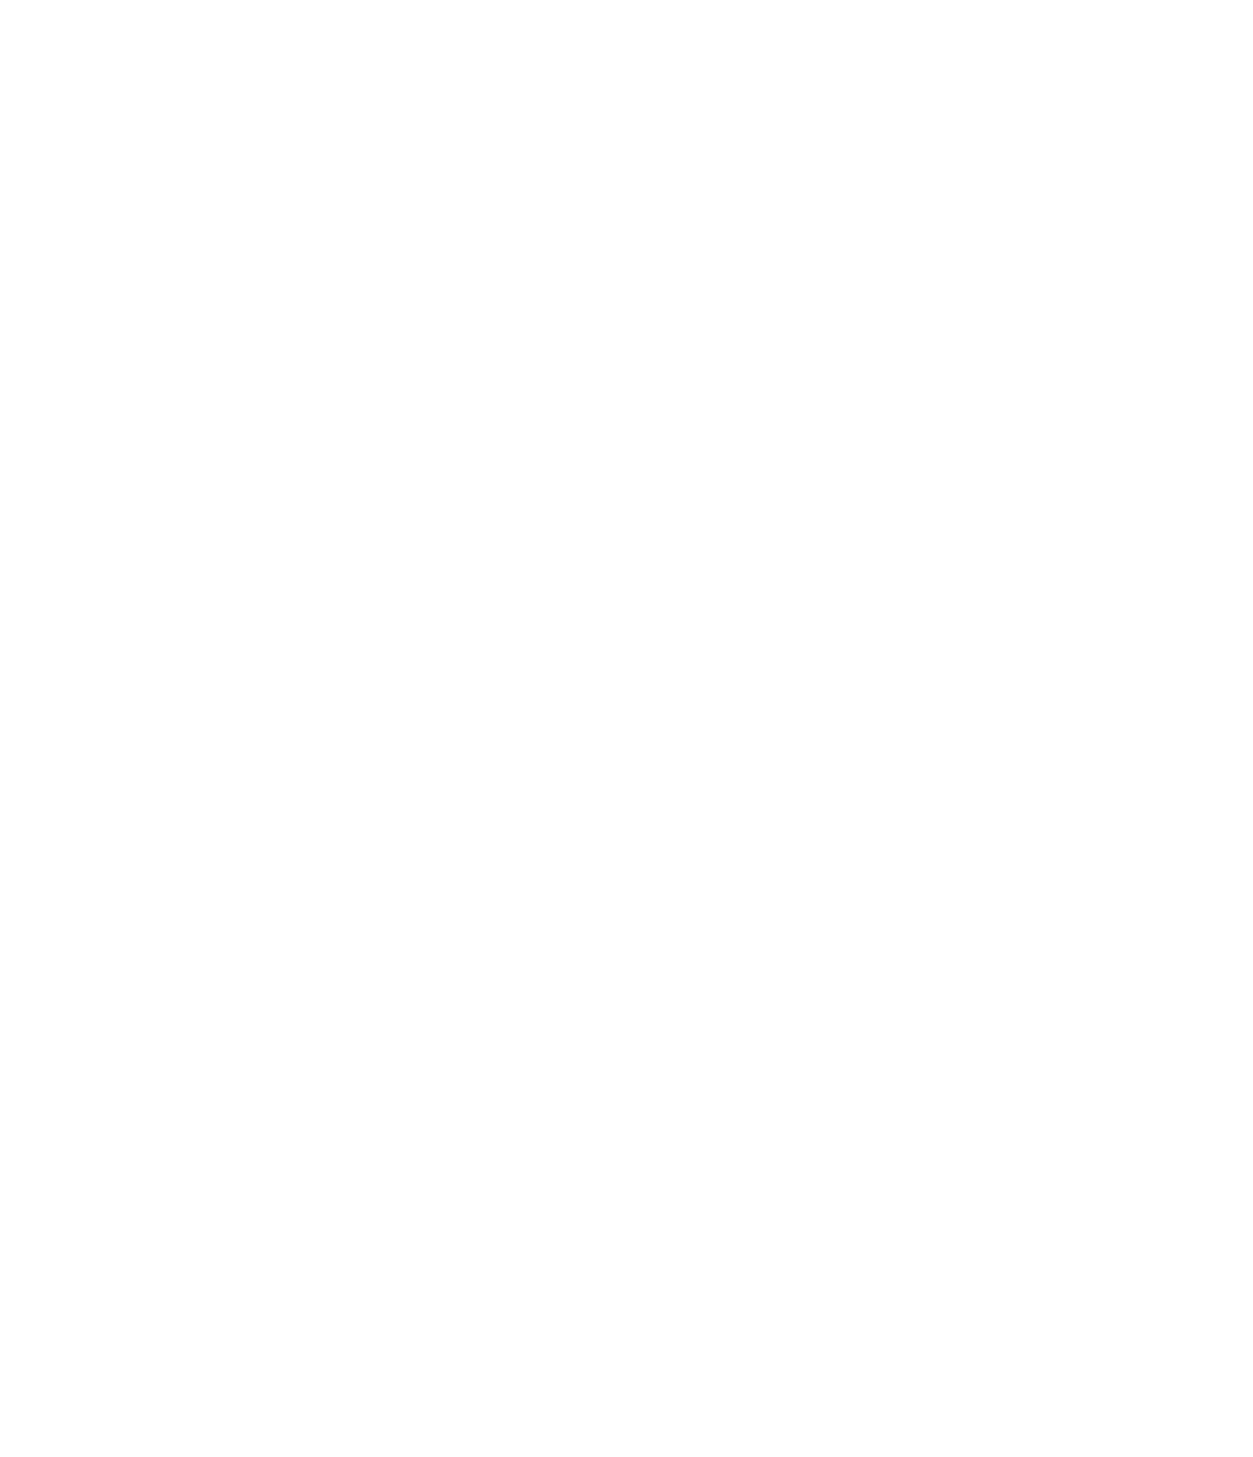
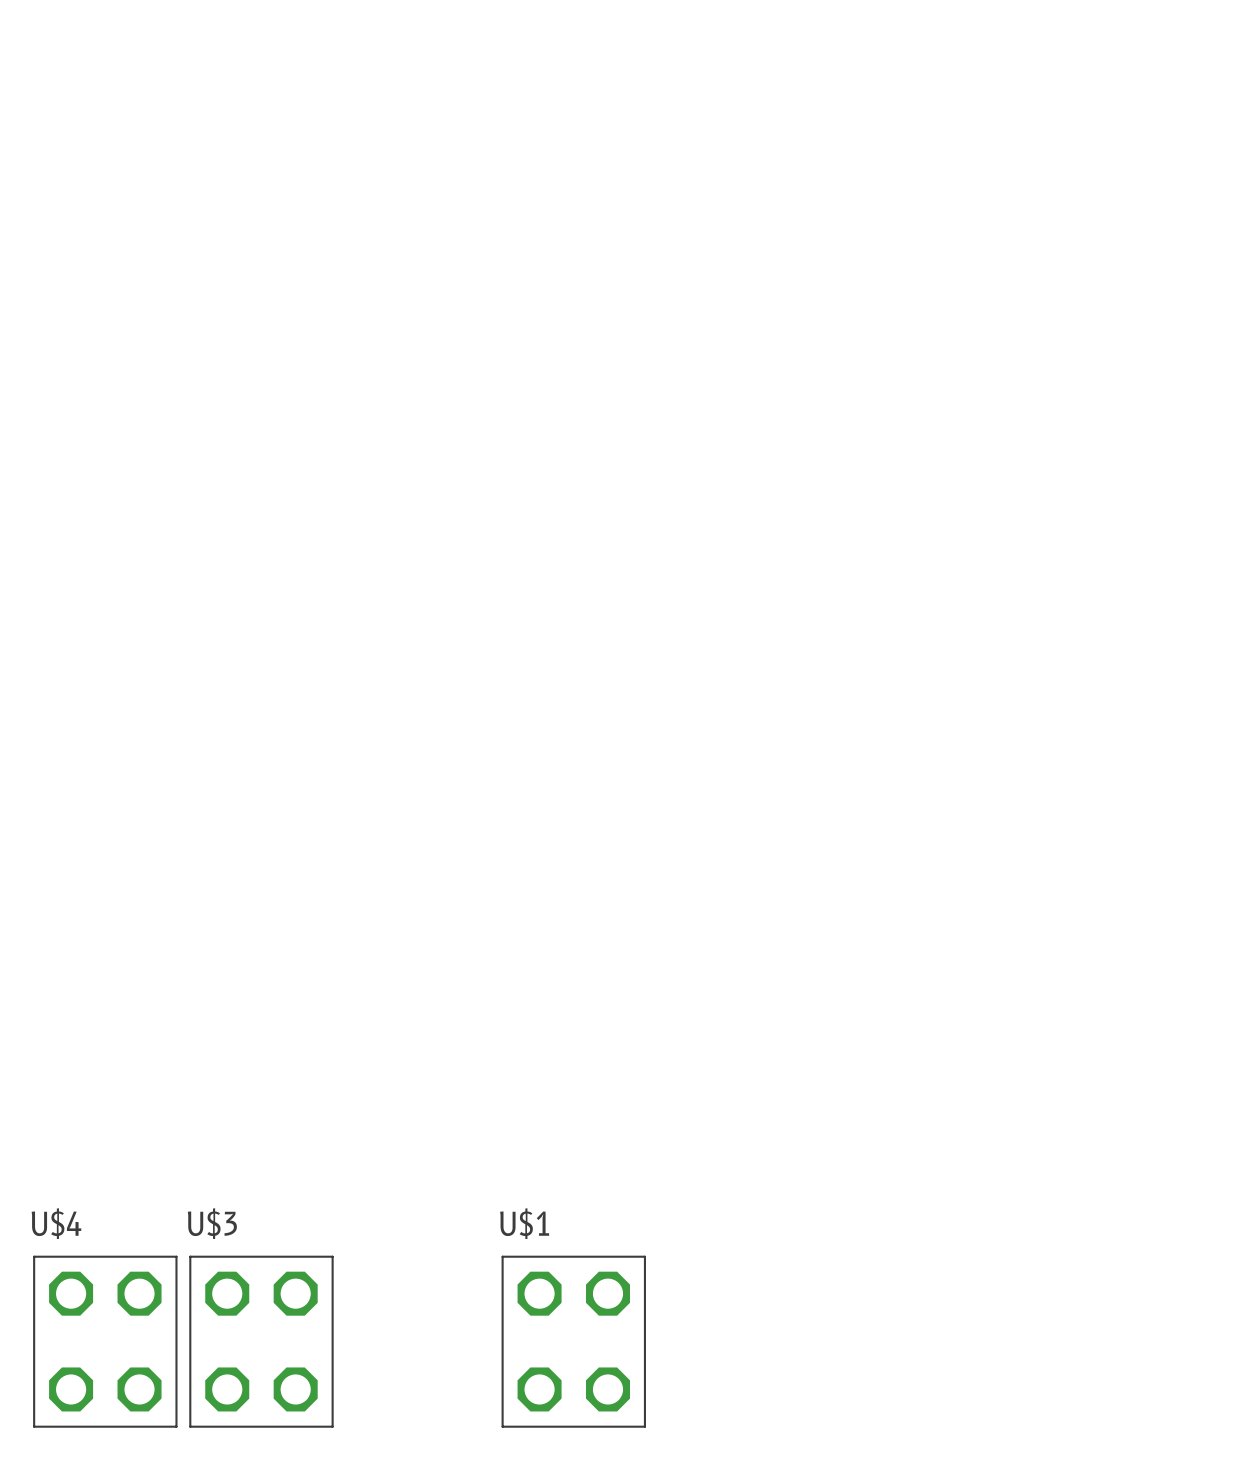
U$4: none -> (105, 1341)
U$3: none -> (261, 1341)
U$1: none -> (573, 1341)

